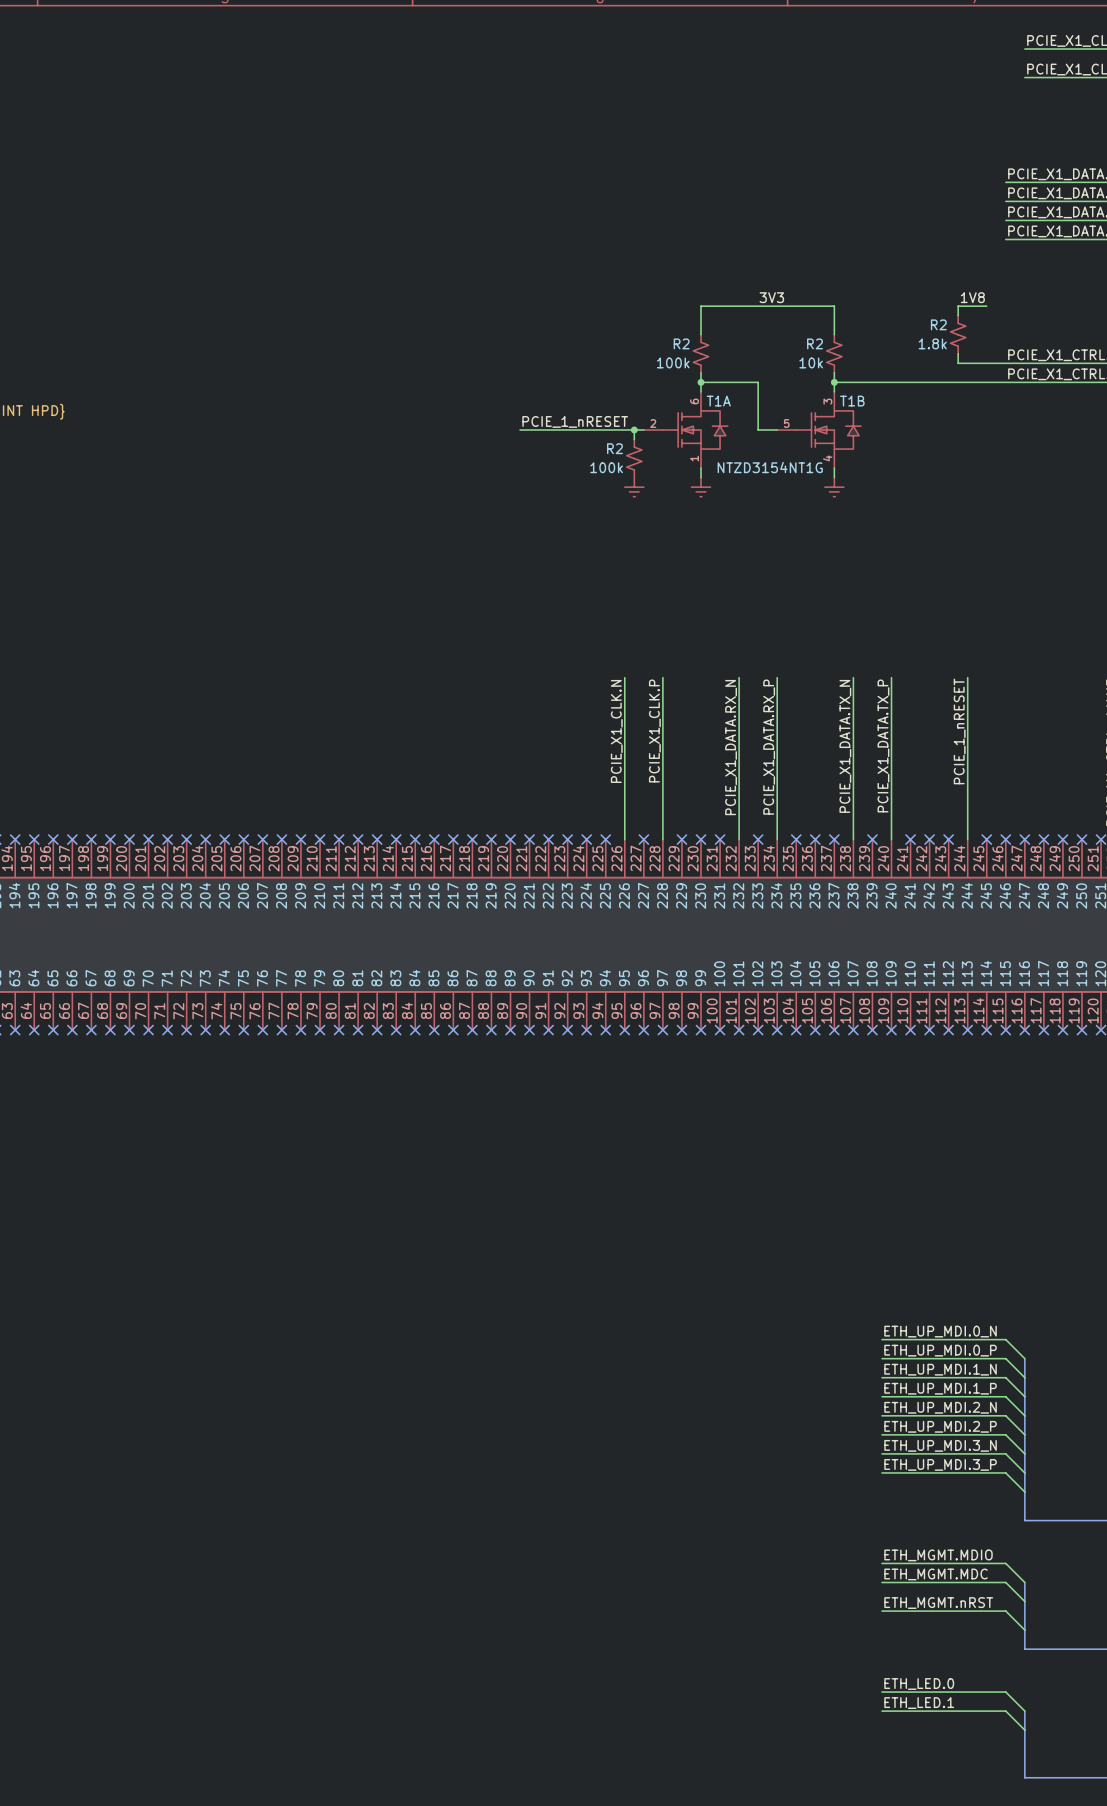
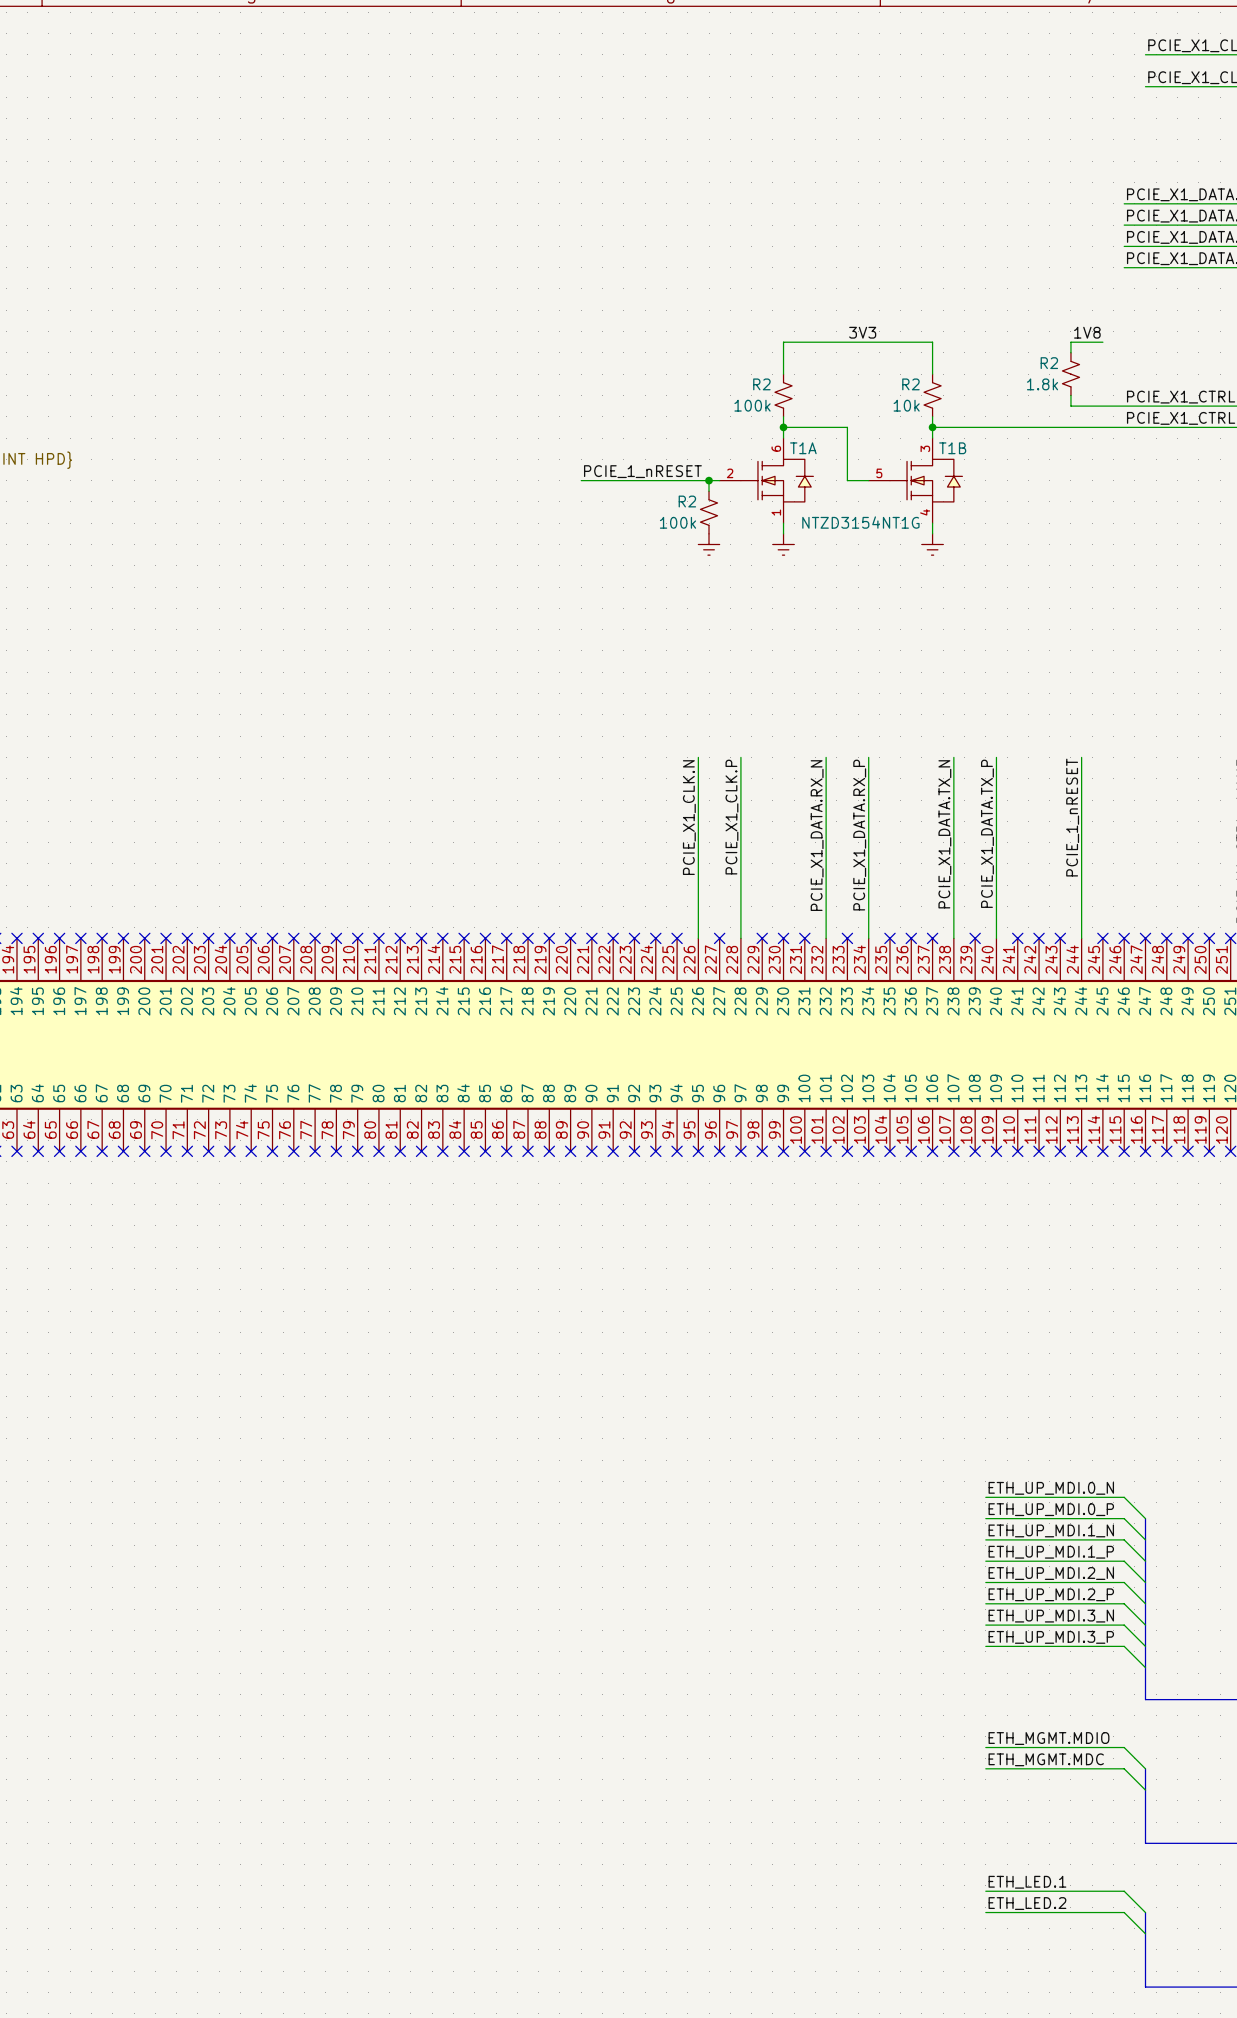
label: ETH_MGMT.nRST (938, 1603) -> none
wire: (881, 1611) (1005, 1611) (1024, 1630) -> none
label: ETH_LED.0 (919, 1684) -> ETH_LED.1 (1027, 1882)
label: ETH_LED.1 (919, 1703) -> ETH_LED.2 (1027, 1903)

